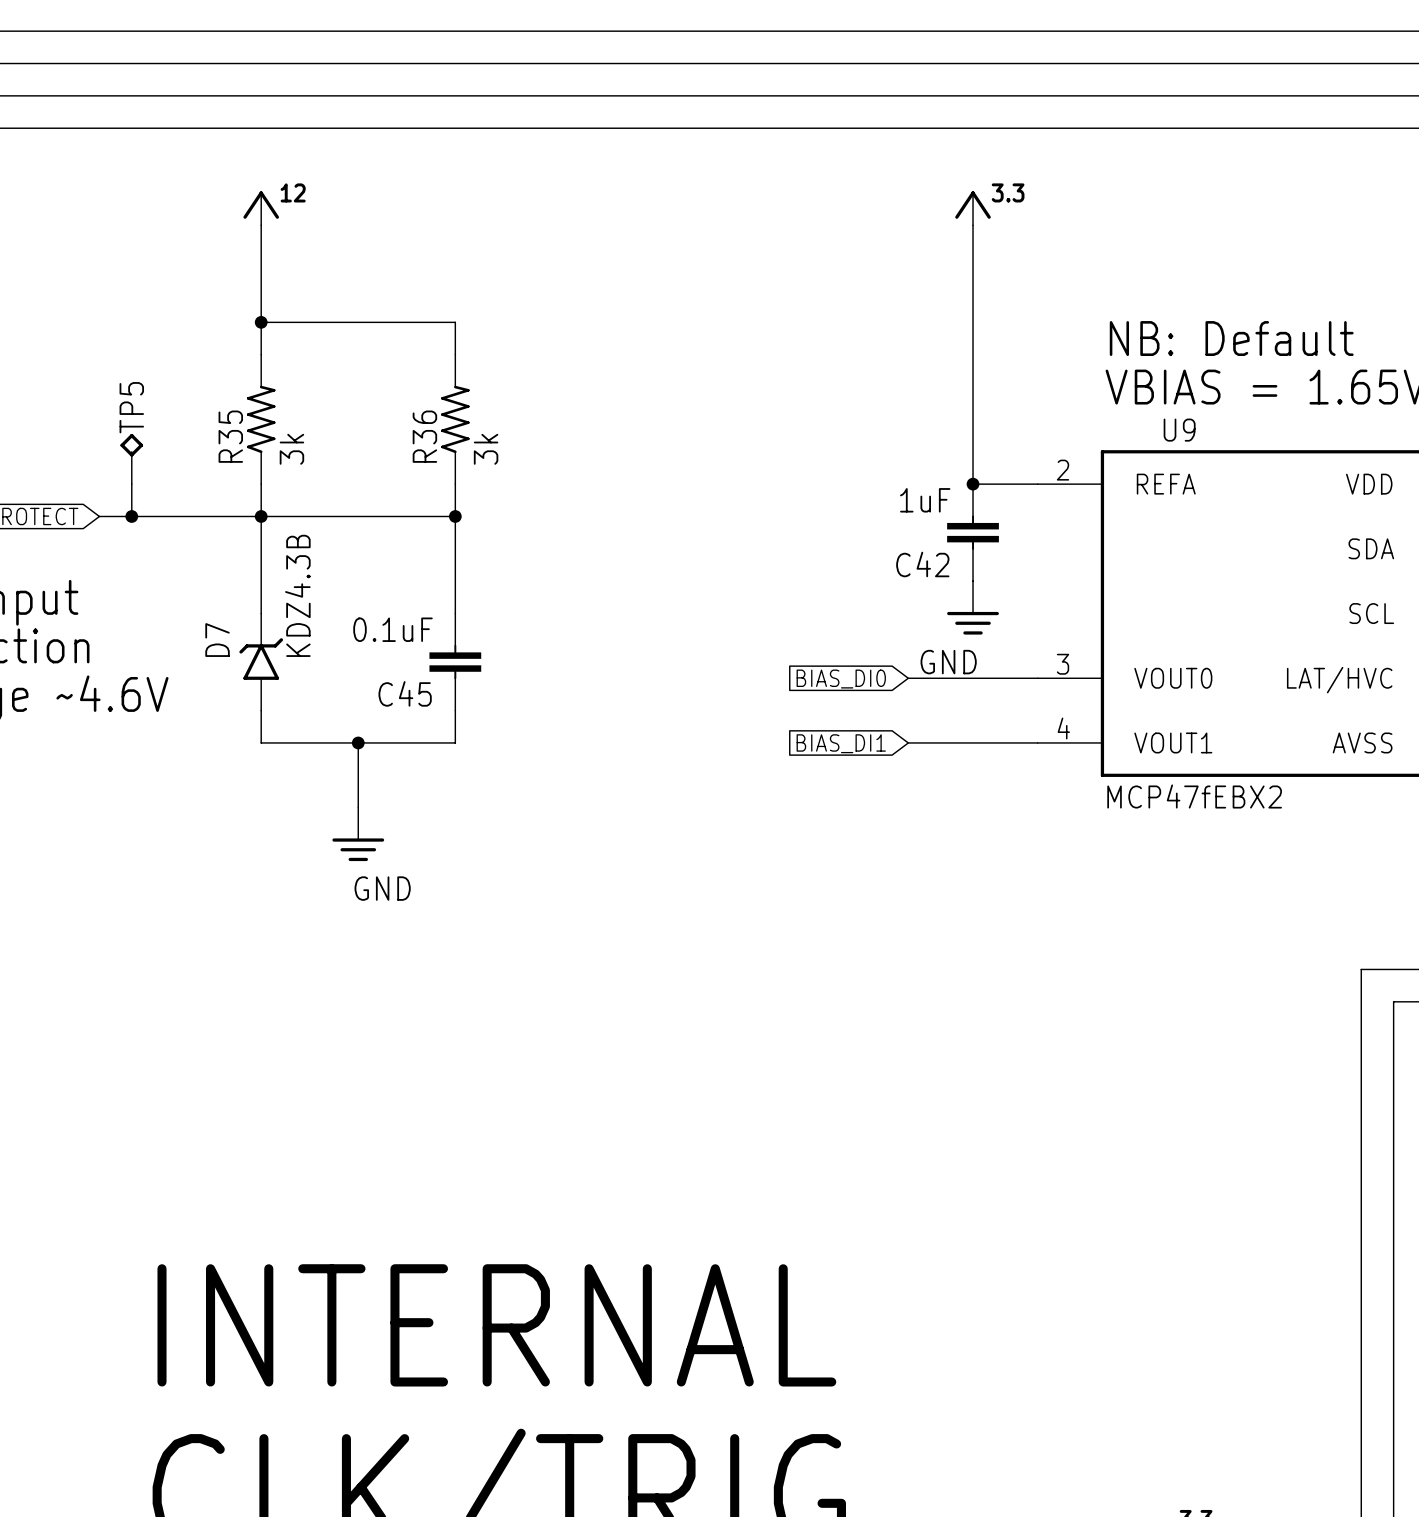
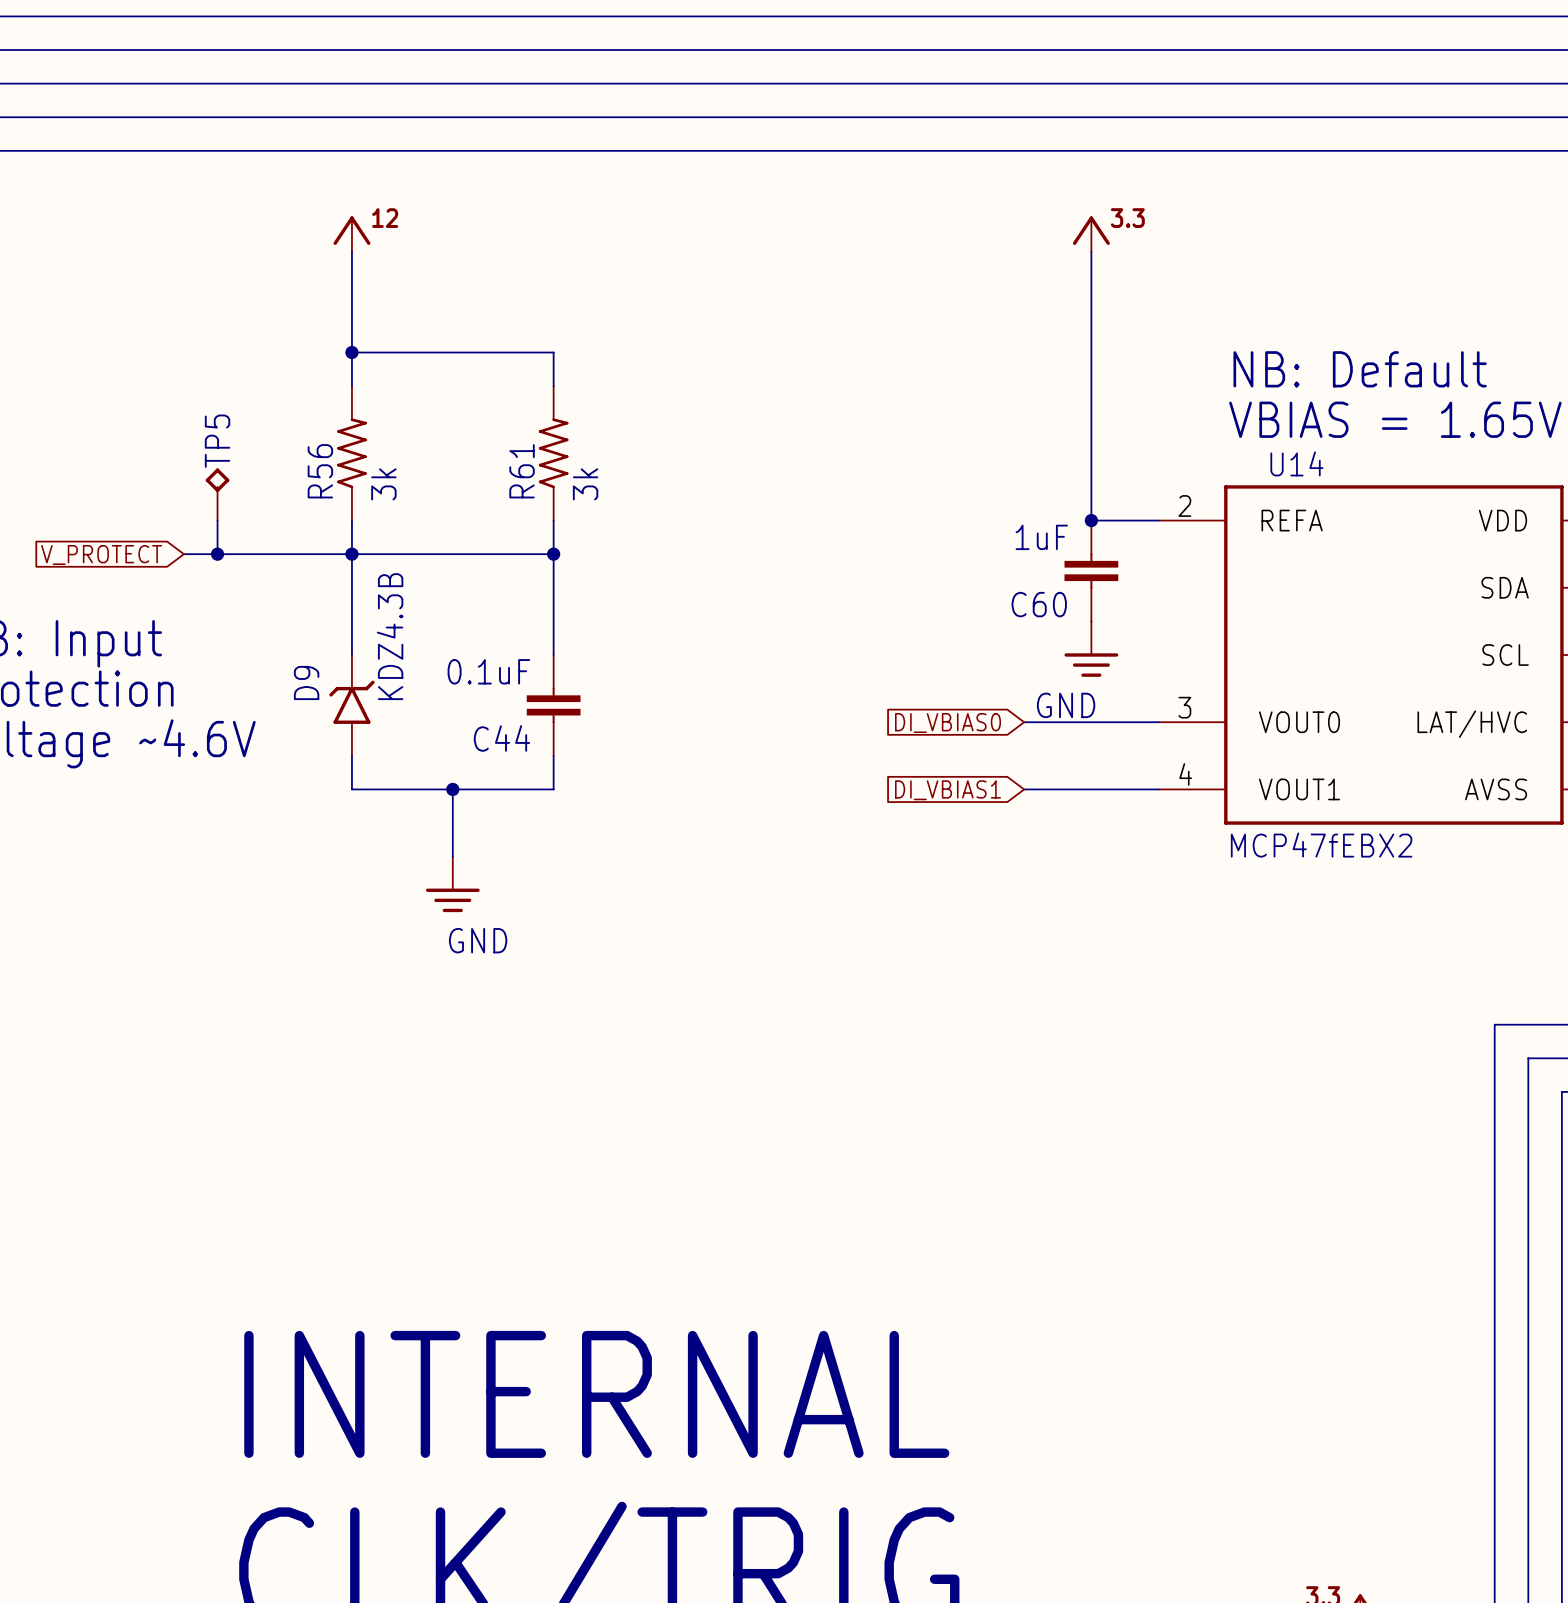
U9 name: U9 (1179, 430) -> U14 (1296, 463)
R35 name: R35 (230, 436) -> R56 (320, 471)
R36 name: R36 (424, 436) -> R61 (522, 471)
C42 name: C42 (922, 564) -> C60 (1039, 604)
D7 name: D7 (217, 640) -> D9 (306, 683)
global label: BIAS_DI0 (841, 679) -> DI_VBIAS0 (948, 723)
C45 name: C45 (405, 693) -> C44 (501, 738)
global label: BIAS_DI1 (841, 743) -> DI_VBIAS1 (948, 790)

